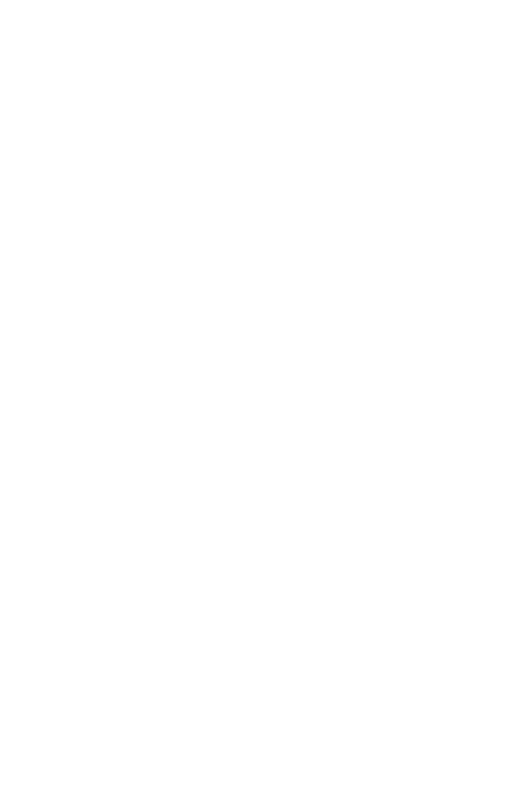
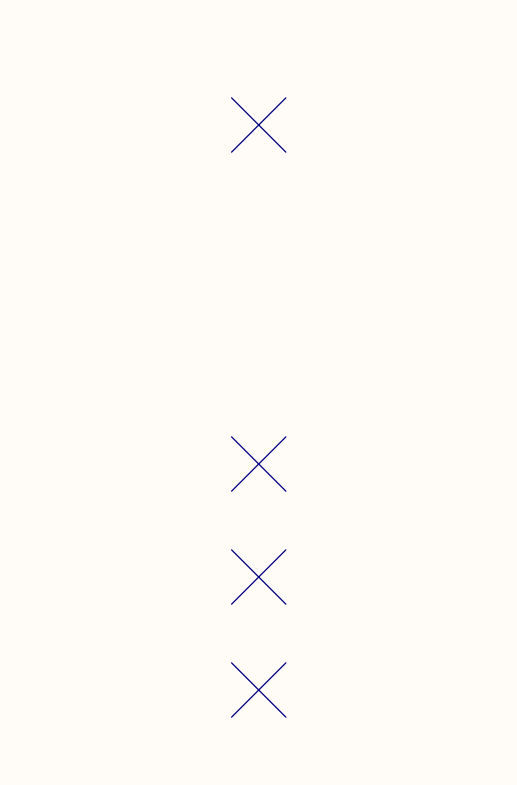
no-connect mark: none -> (258, 125)
no-connect mark: none -> (258, 464)
no-connect mark: none -> (258, 577)
no-connect mark: none -> (258, 690)

